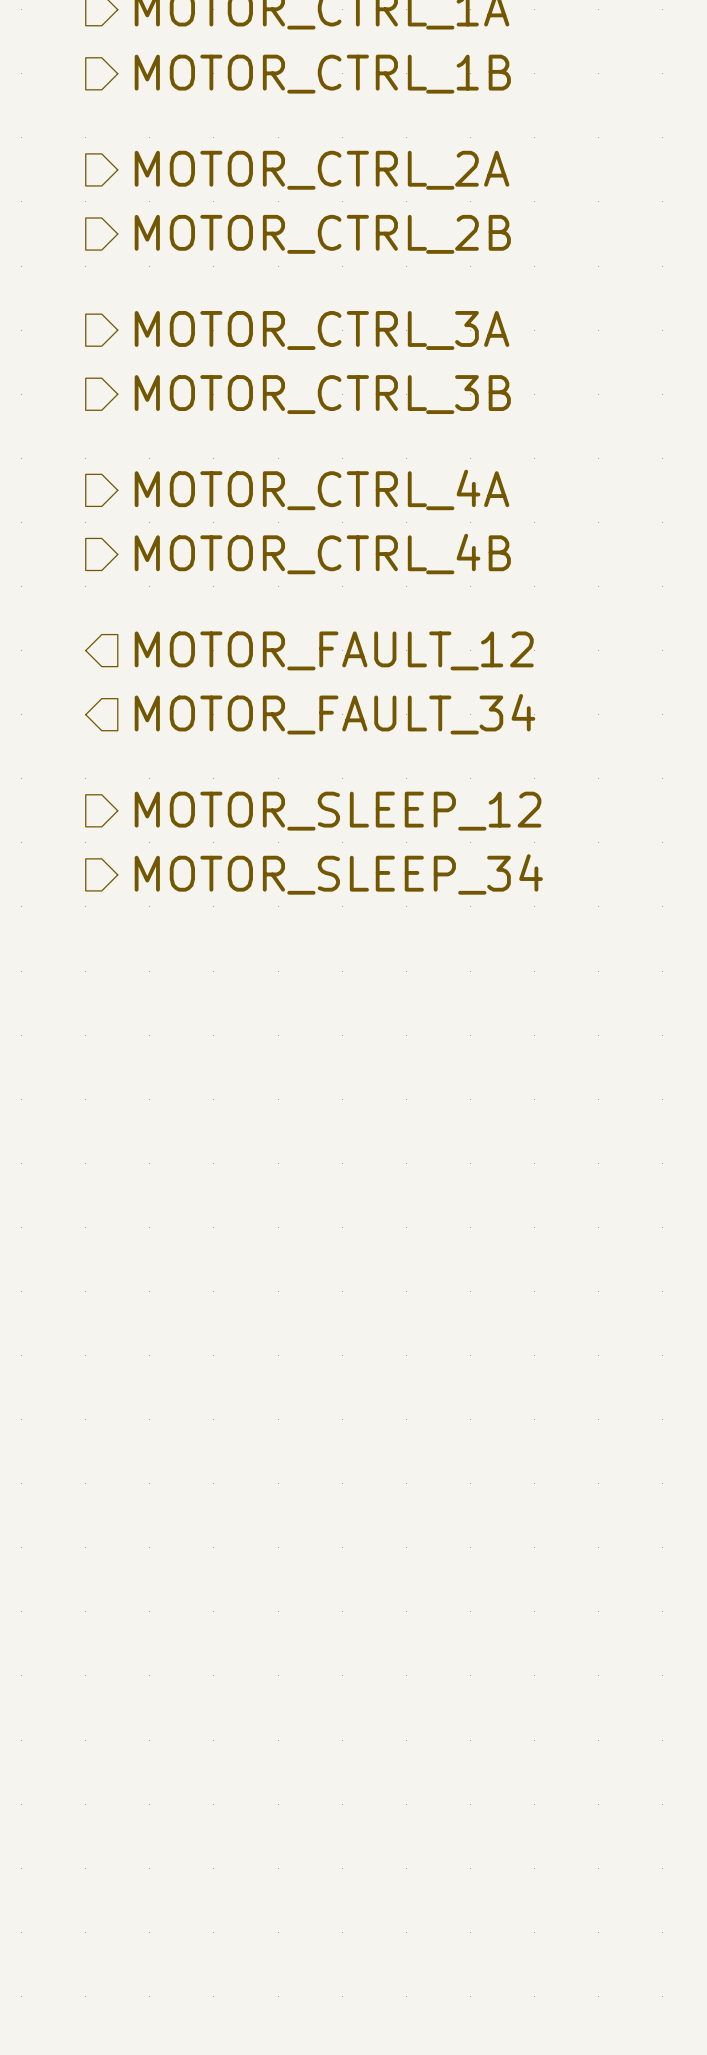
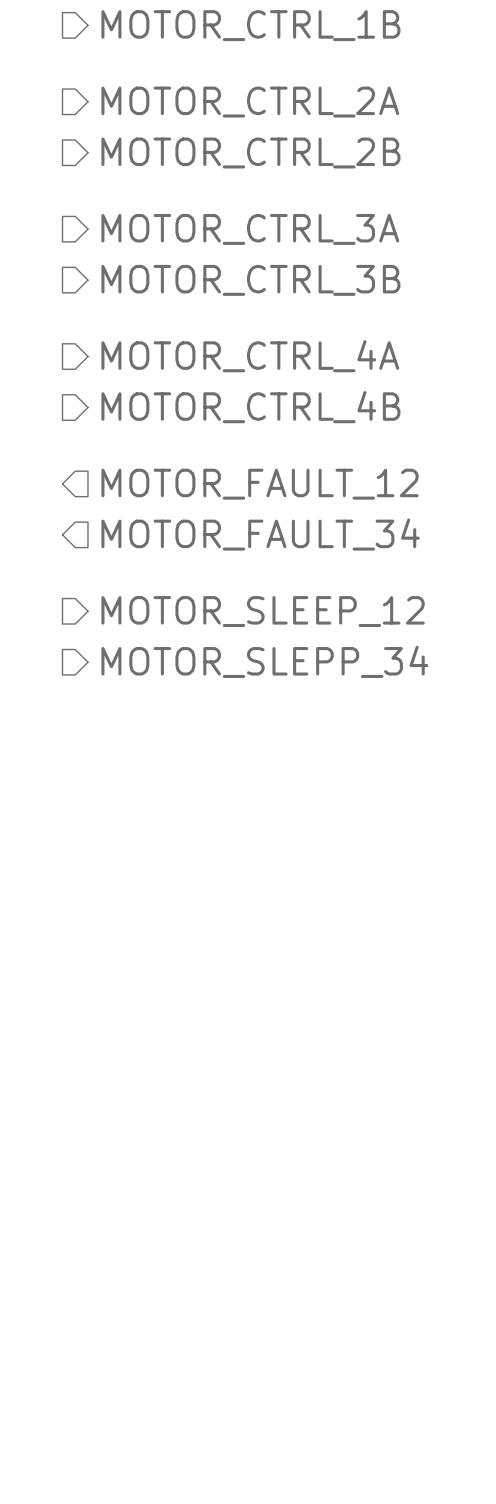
hierarchical label: MOTOR_SLEEP_34 (338, 874) -> MOTOR_SLEPP_34 (264, 661)

